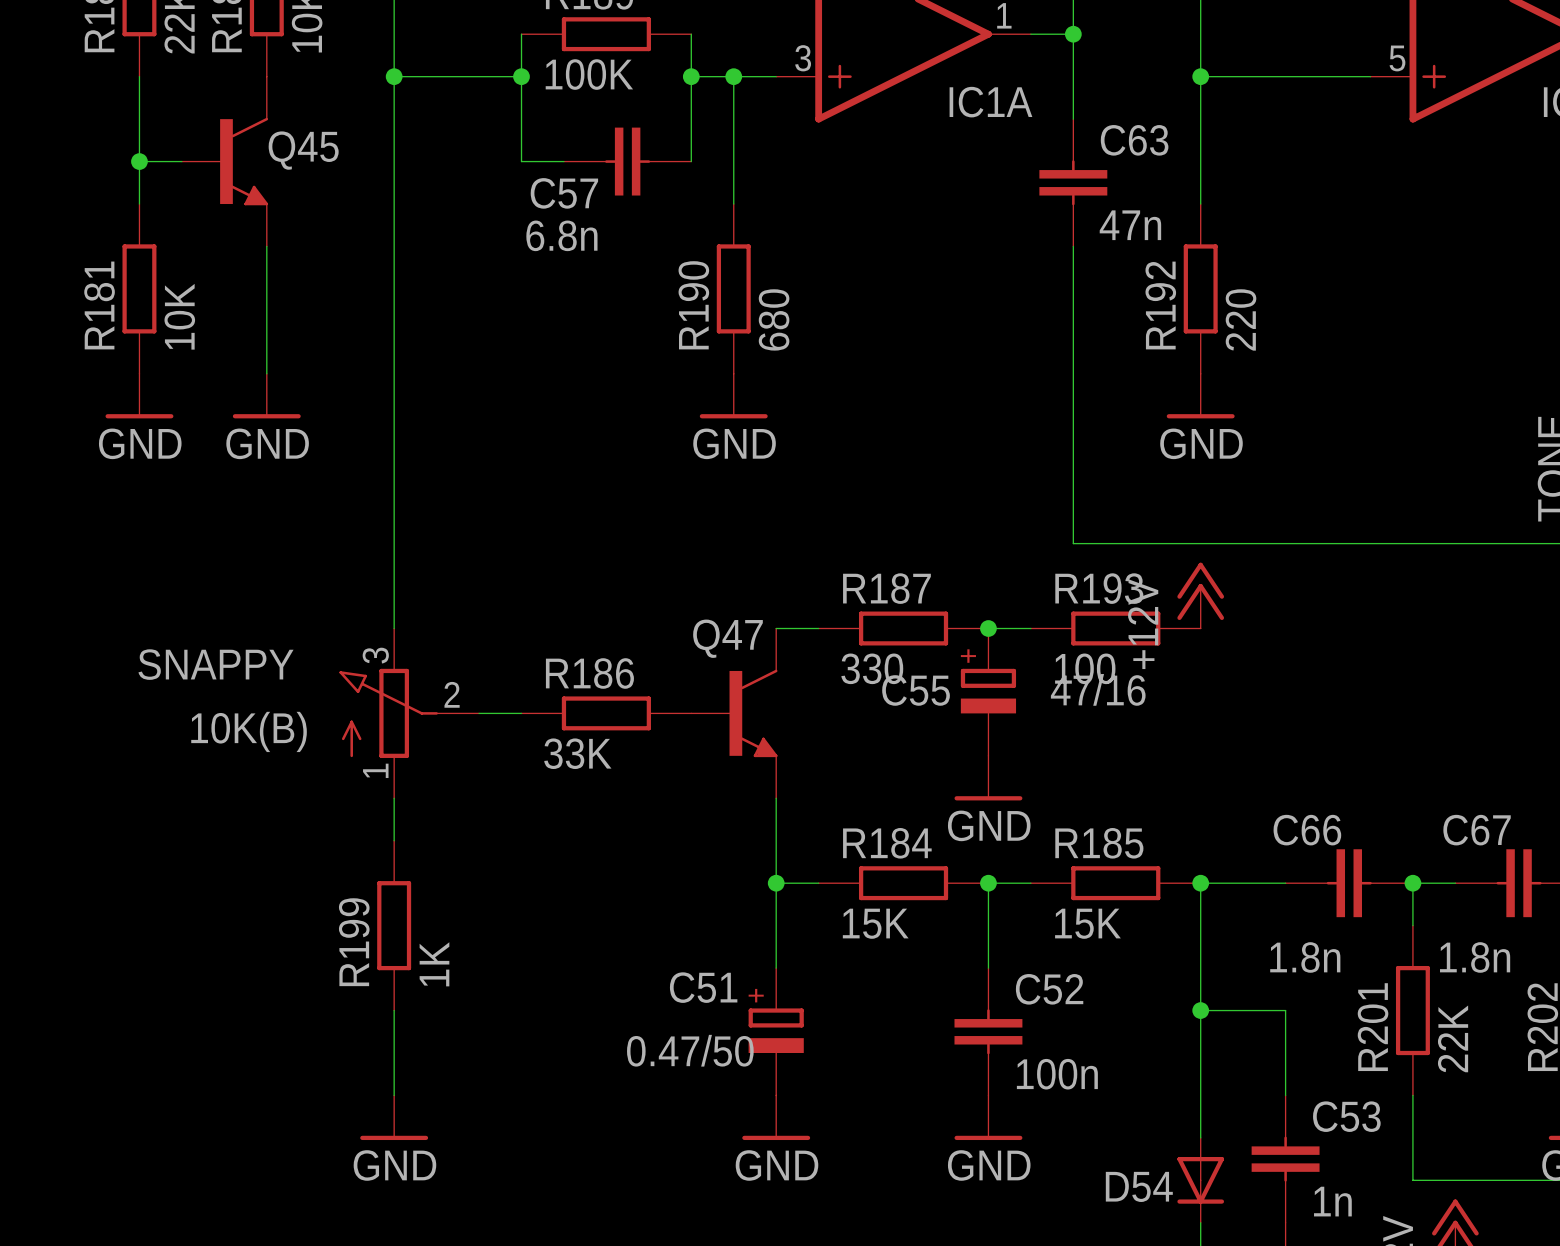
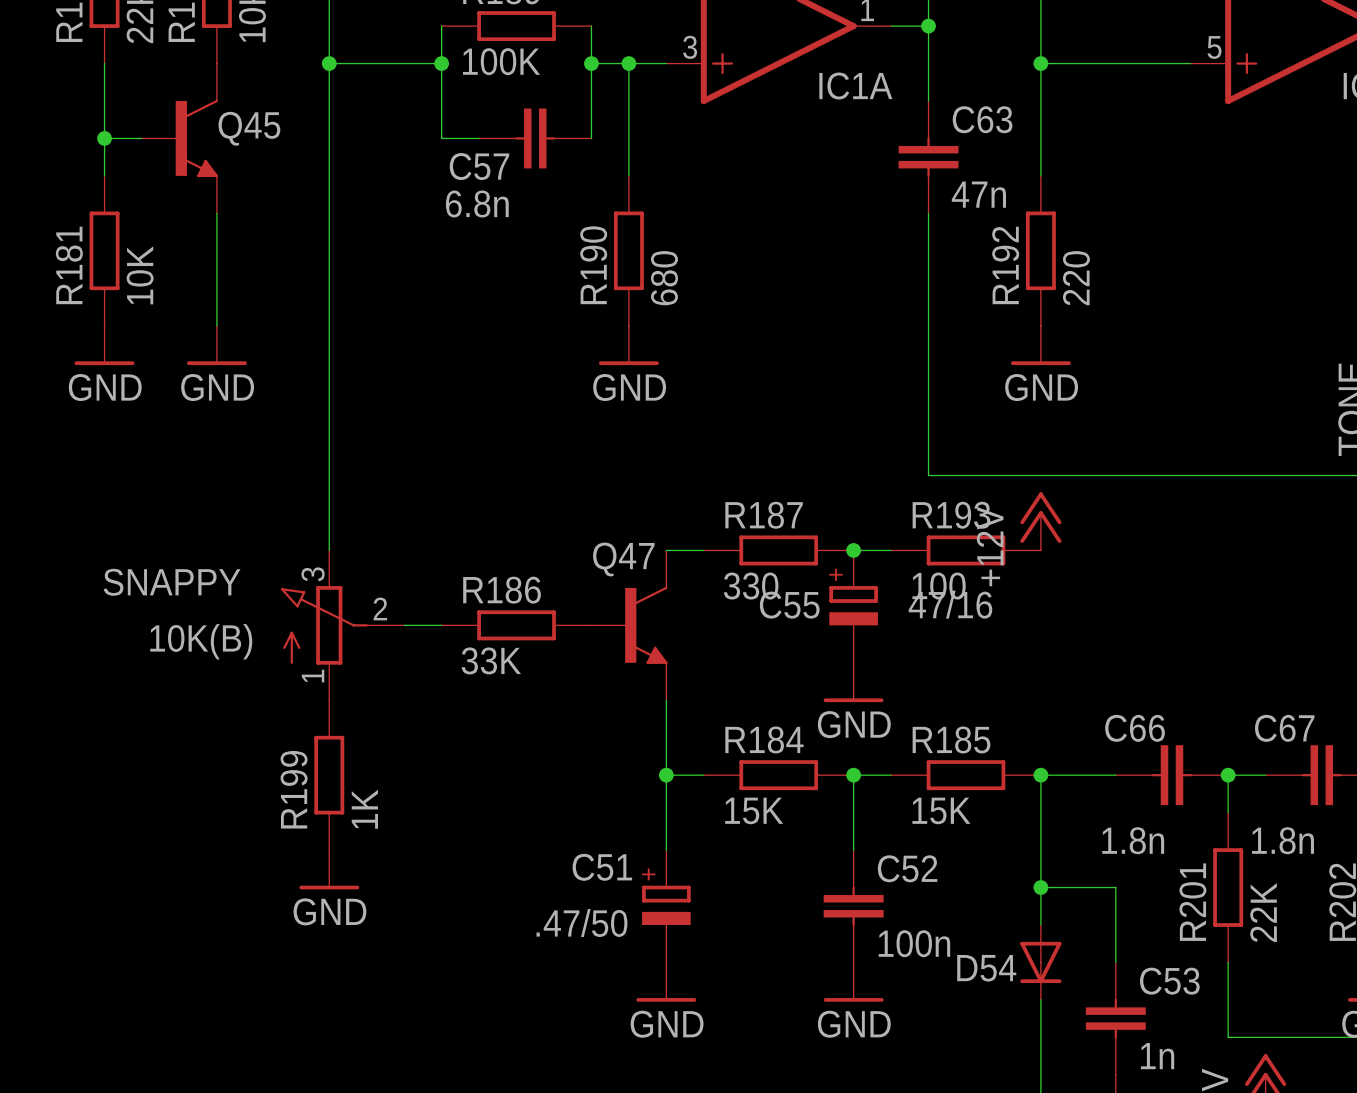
R199 position: (394, 925) -> (329, 775)
wire: (394, 1010) (394, 1095) -> none
C51 value: 0.47/50 (690, 1050) -> .47/50 (581, 922)
power symbol position: GND (394, 1117) -> GND (329, 869)
D54 position: (1200, 1180) -> (1040, 962)

